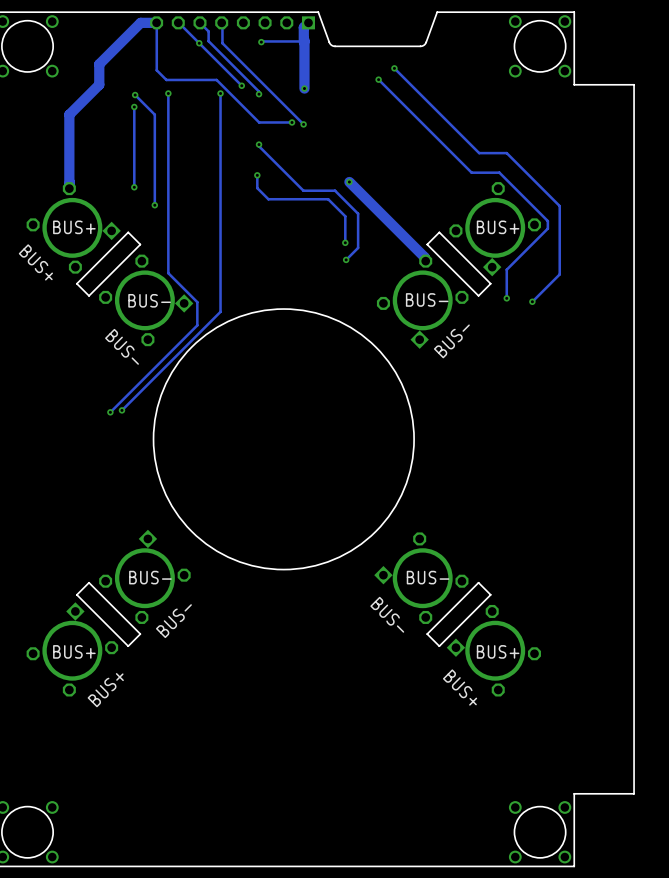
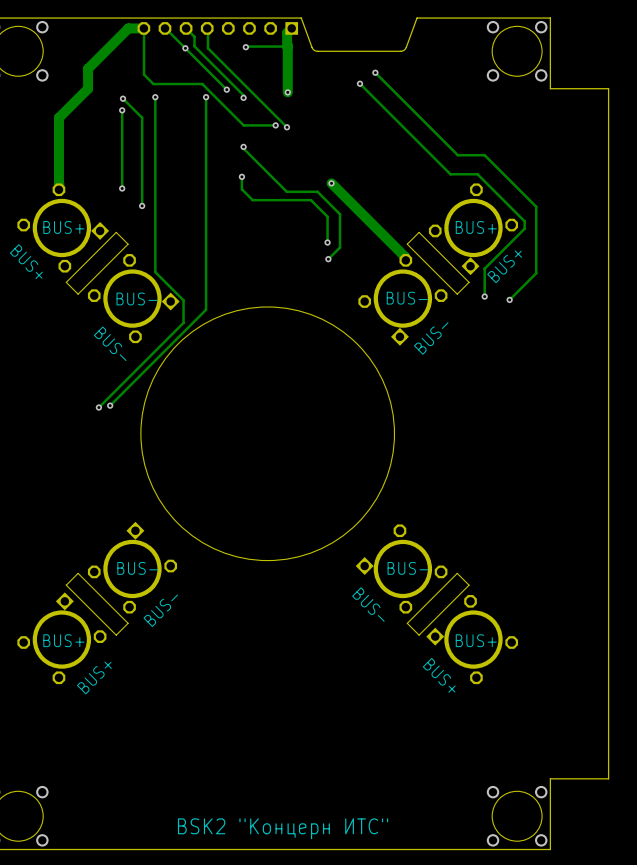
text: none -> BUS+ (504, 266)
text: none -> BSK2 "Концерн ИТС" (283, 828)

